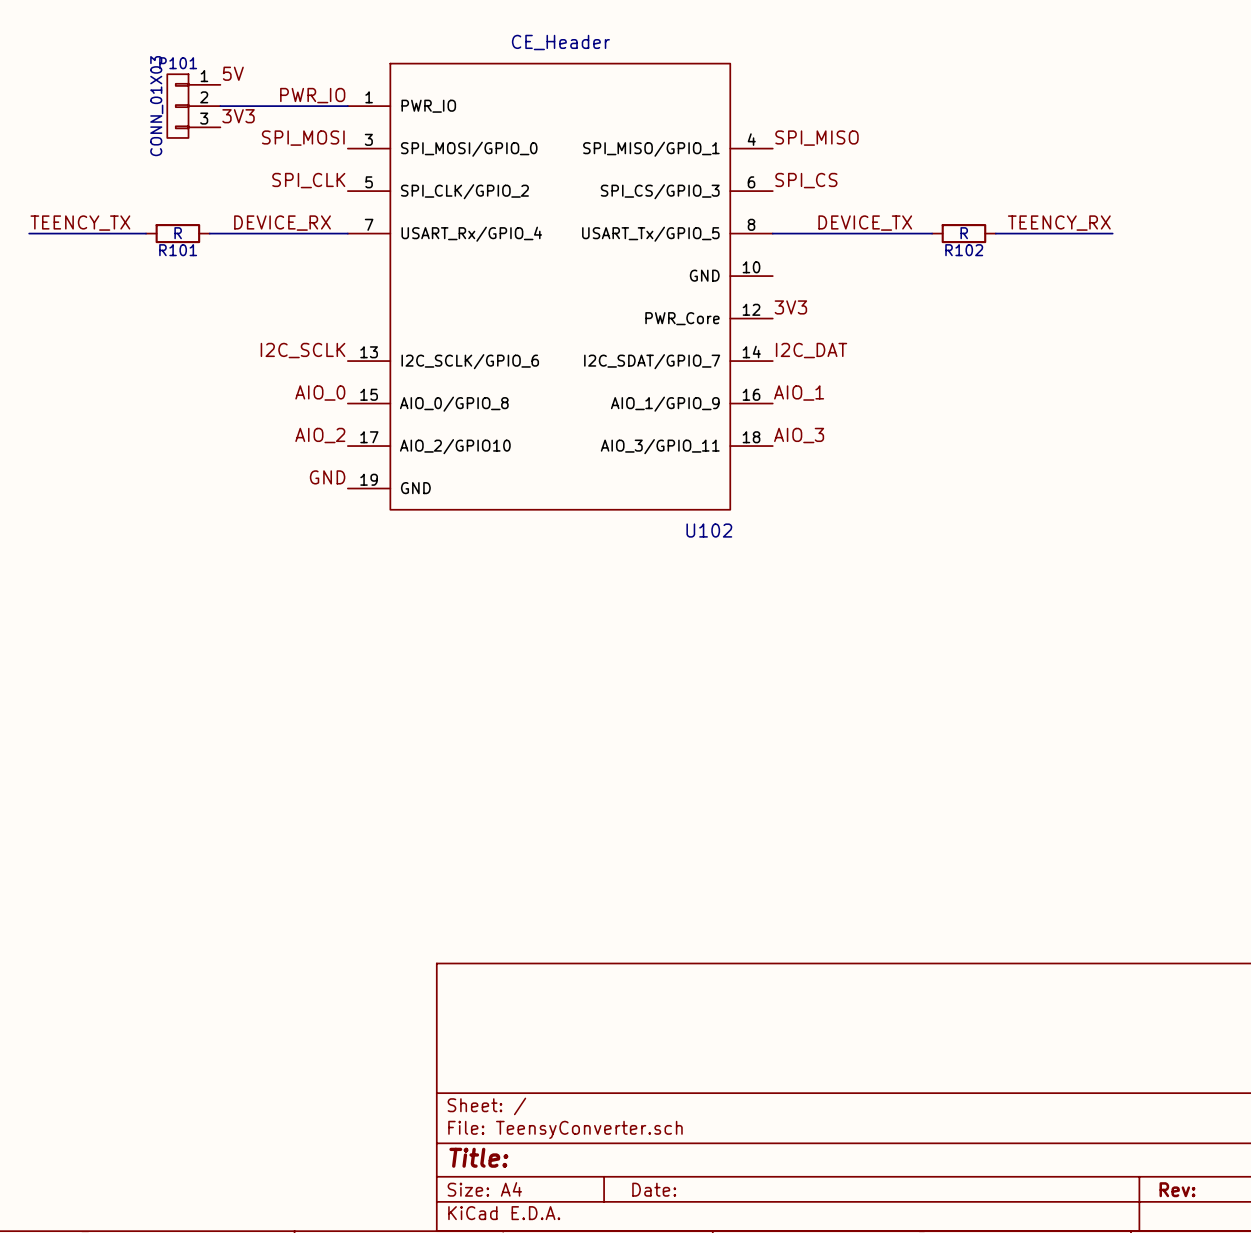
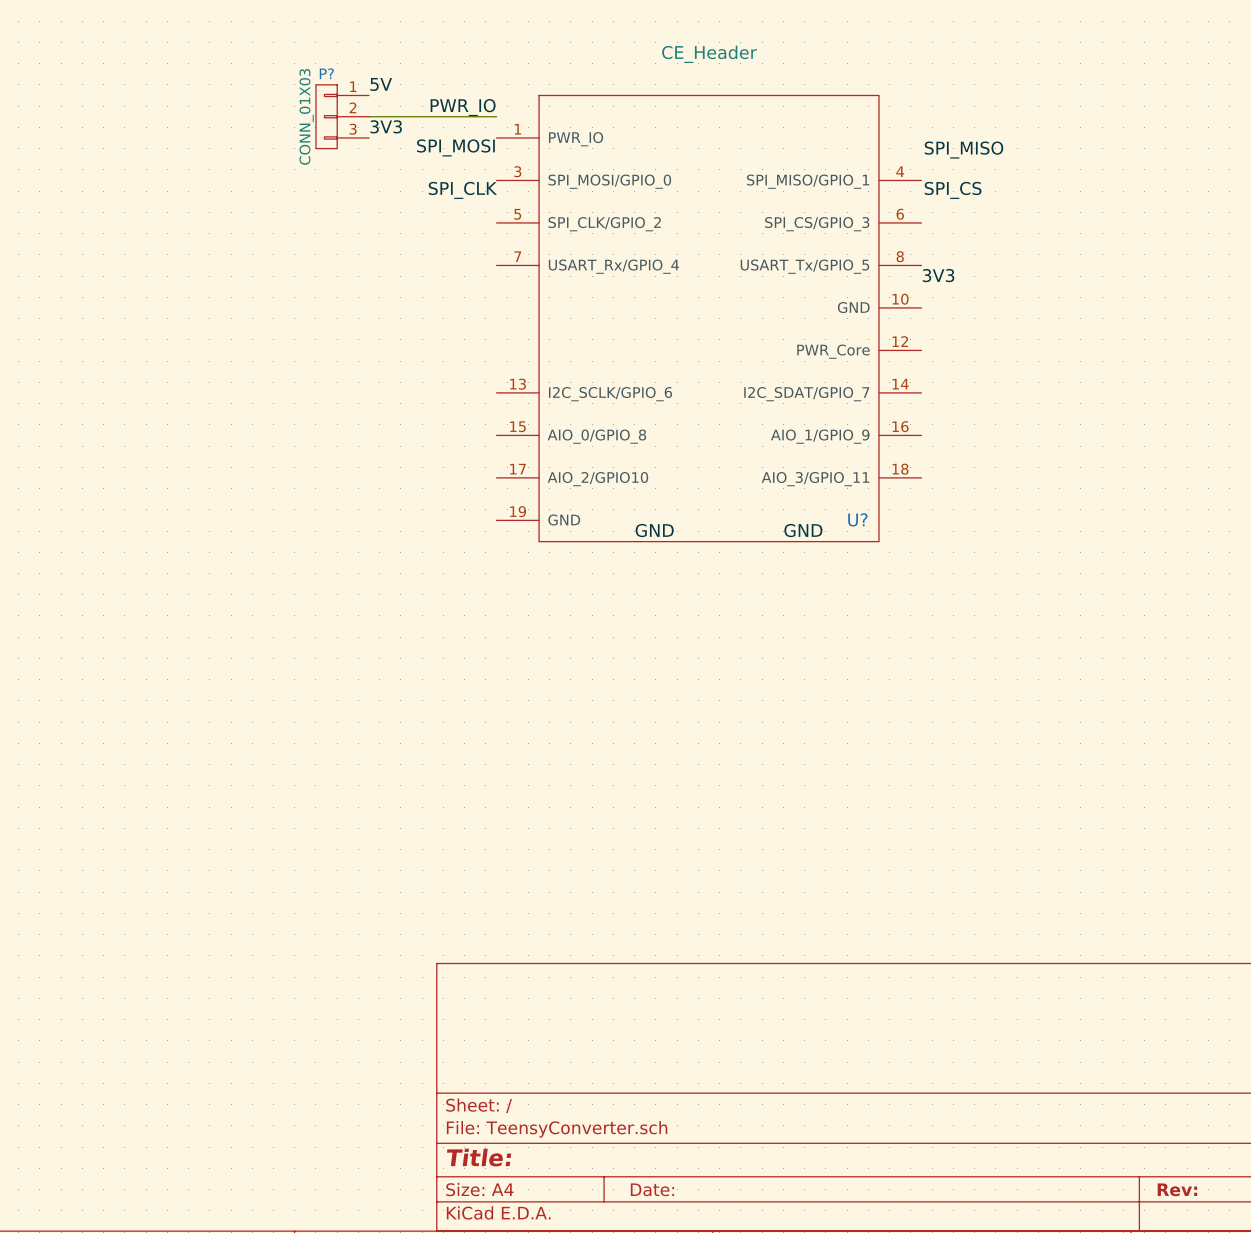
label position: 5V (233, 73) -> 5V (381, 84)
label position: PWR_IO (312, 95) -> PWR_IO (463, 107)
P101: CONN_01X03 (193, 106) -> none
wire: (220, 106) (347, 106) -> (369, 116) (496, 116)
label position: 3V3 (238, 116) -> 3V3 (386, 126)
P?: none -> CONN_01X03 (342, 116)
label position: SPI_MOSI (303, 138) -> SPI_MOSI (455, 147)
label position: SPI_MISO (816, 138) -> SPI_MISO (964, 150)
label position: SPI_CLK (308, 180) -> SPI_CLK (462, 190)
label position: SPI_CS (806, 180) -> SPI_CS (953, 190)
label: TEENCY_TX (80, 223) -> none
label: DEVICE_RX (282, 223) -> none
label: DEVICE_TX (865, 223) -> none
label: TEENCY_RX (1059, 223) -> none
wire: (29, 233) (146, 233) -> none
R101: R (177, 233) -> none
wire: (209, 233) (347, 233) -> none
wire: (772, 233) (932, 233) -> none
R102: R (963, 233) -> none
wire: (995, 233) (1112, 233) -> none
U102: CE_Header (560, 286) -> none
label position: 3V3 (790, 307) -> 3V3 (938, 275)
U?: none -> CE_Header (709, 318)
label: I2C_SCLK (303, 350) -> none
label: I2C_DAT (811, 350) -> none
label: AIO_0 (320, 393) -> none
label: AIO_1 (799, 393) -> none
label: AIO_2 (320, 435) -> none
label: AIO_3 (799, 435) -> none
label: GND (327, 477) -> none
label: none -> GND (654, 530)
label: none -> GND (803, 530)

